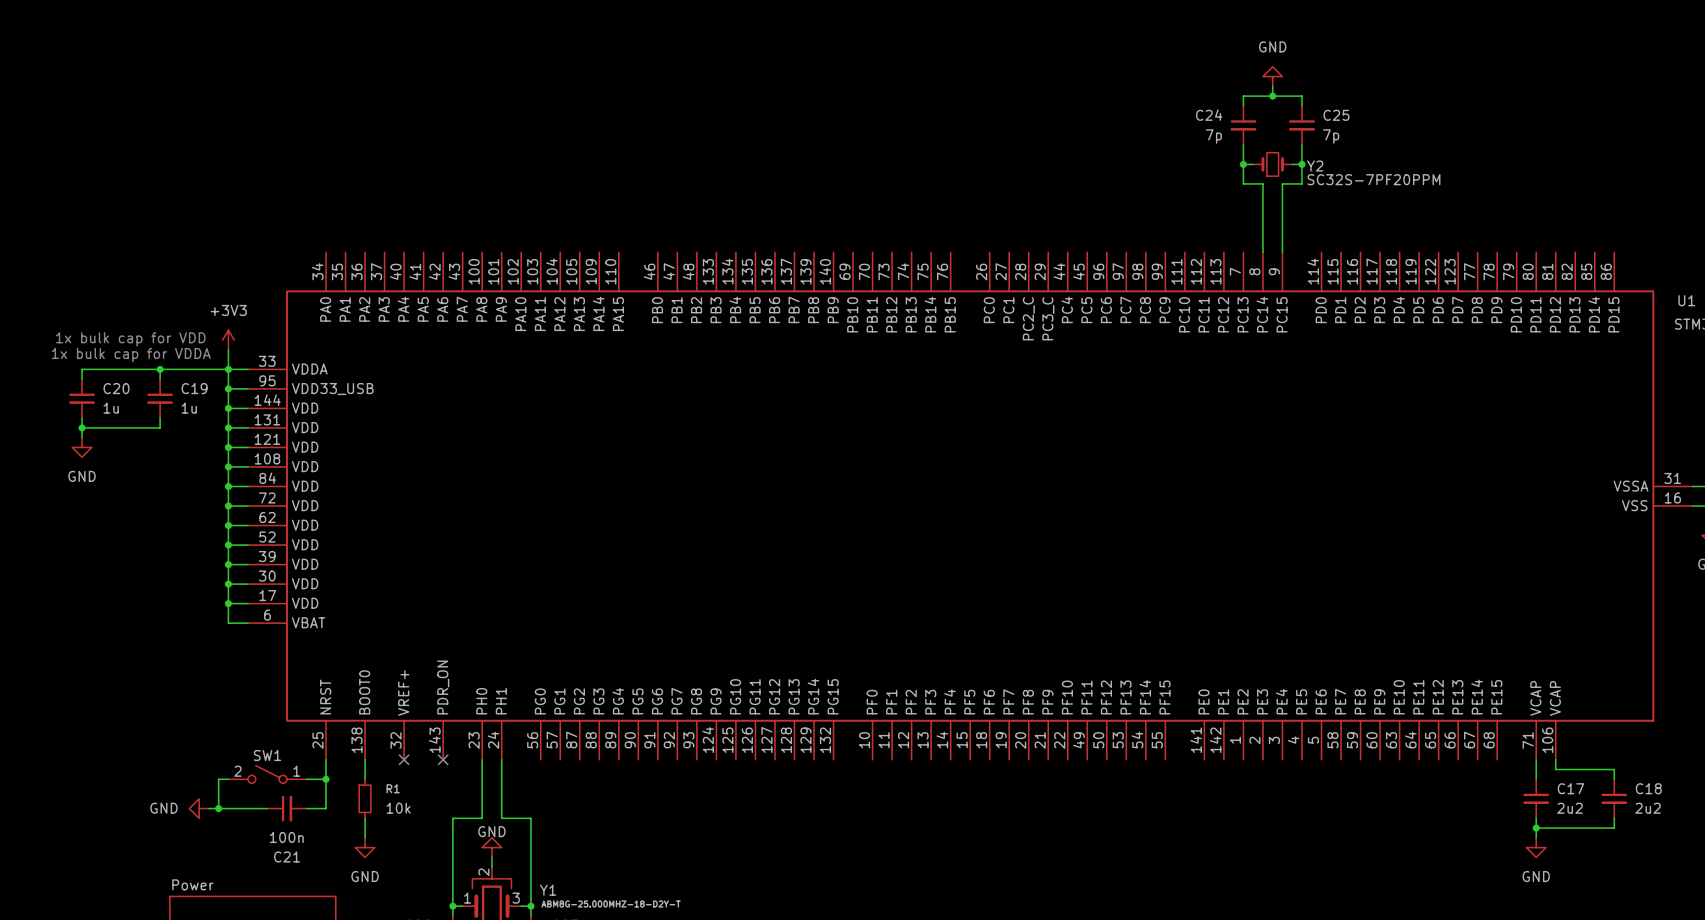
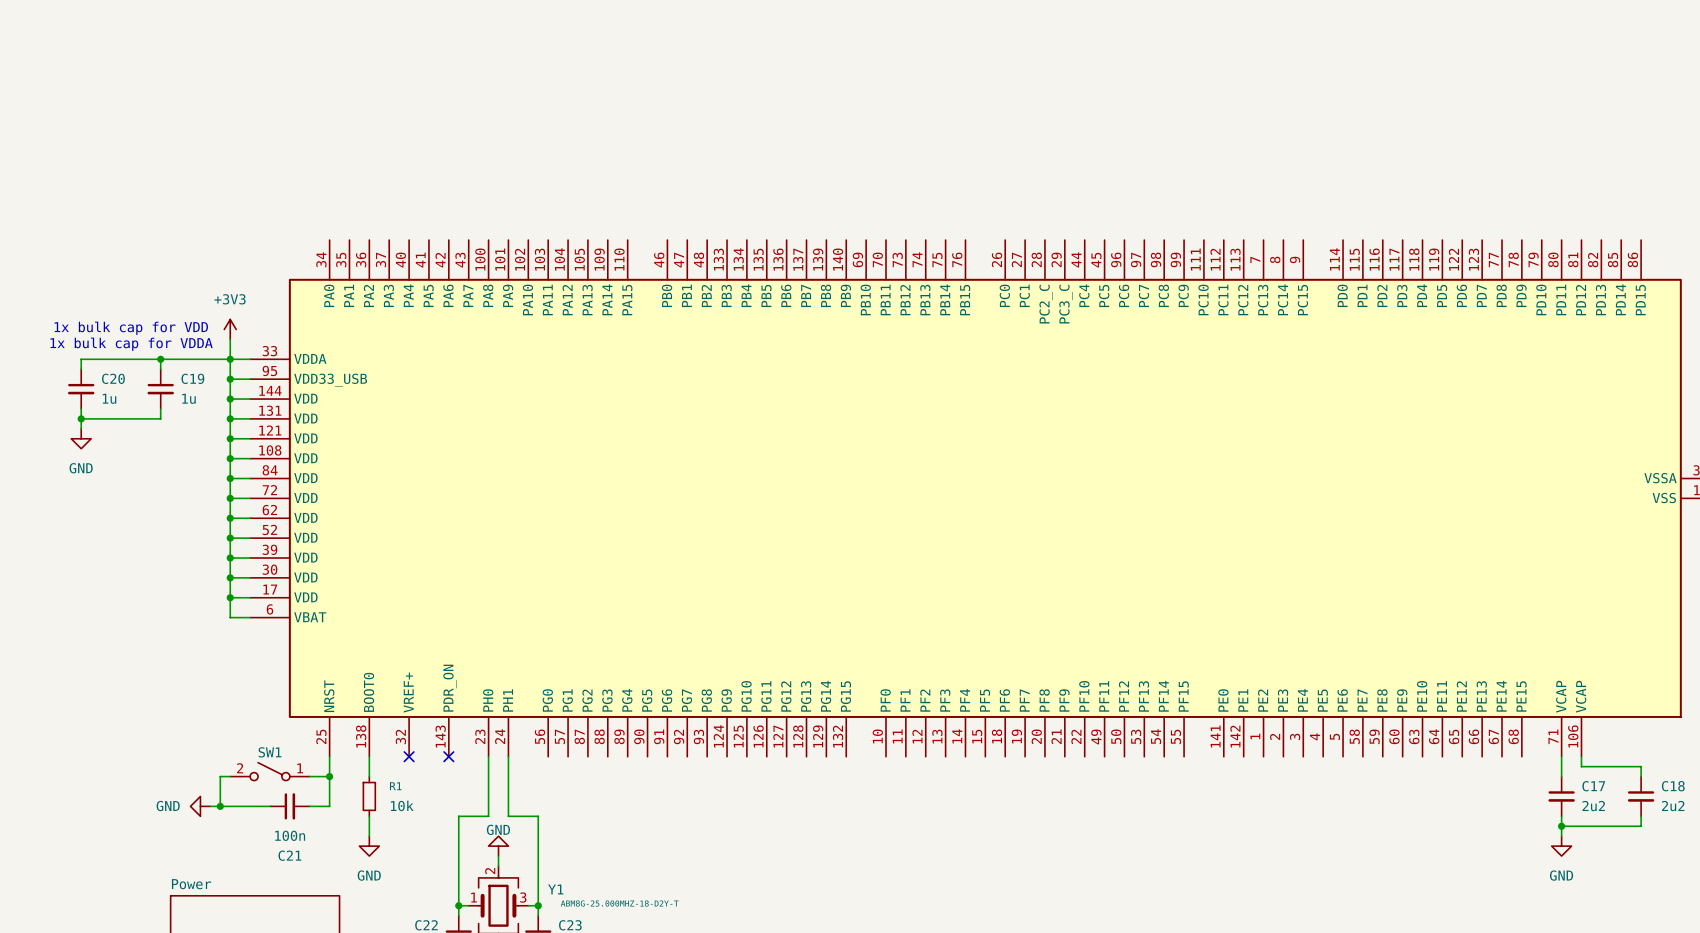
power symbol: GND (1272, 76) -> none
wire: (1272, 86) (1272, 96) -> none
junction: (1272, 96) -> none
wire: (1243, 105) (1243, 96) (1301, 96) (1301, 105) -> none
C24: 7p (1243, 125) -> none
C25: 7p (1301, 125) -> none
wire: (1243, 144) (1243, 183) (1262, 183) (1262, 252) -> none
wire: (1301, 144) (1301, 183) (1282, 183) (1282, 252) -> none
wire: (1243, 164) (1253, 164) -> none
junction: (1243, 164) -> none
Y2: SC32S-7PF20PPM (1272, 164) -> none
wire: (1292, 164) (1301, 164) -> none
junction: (1301, 164) -> none

